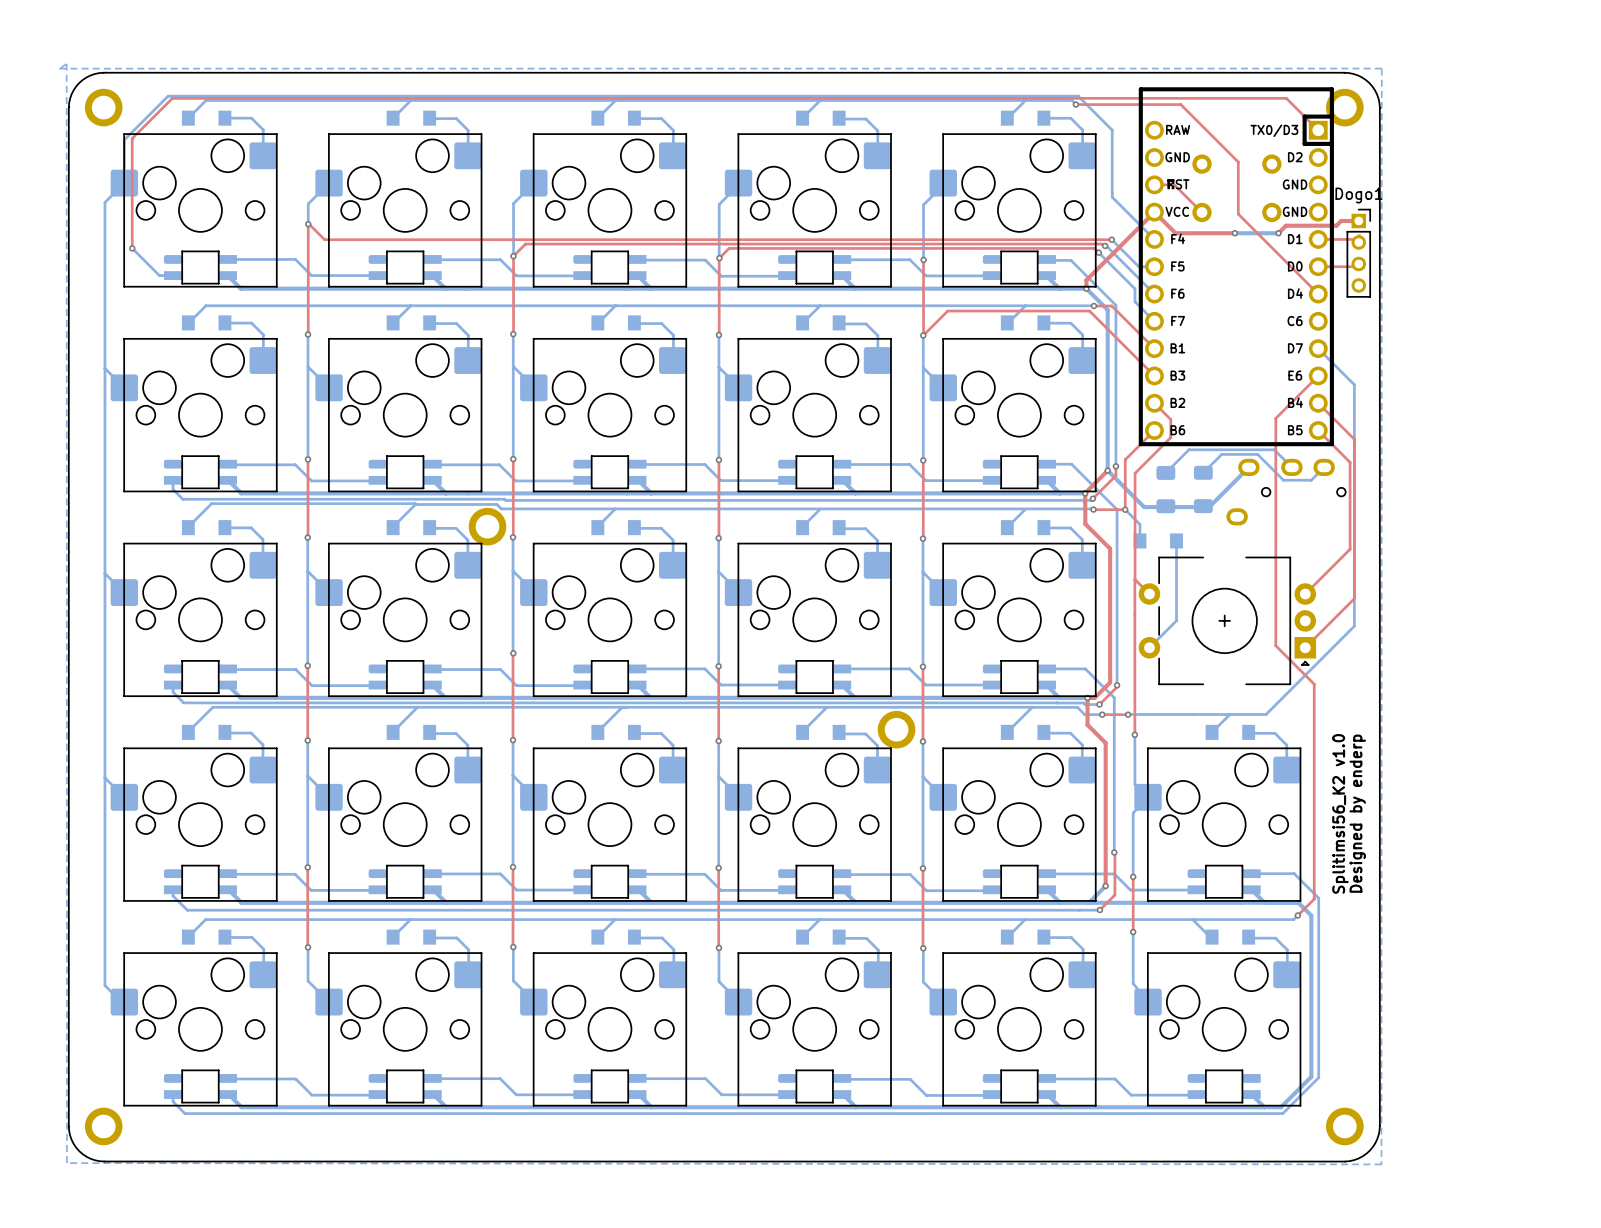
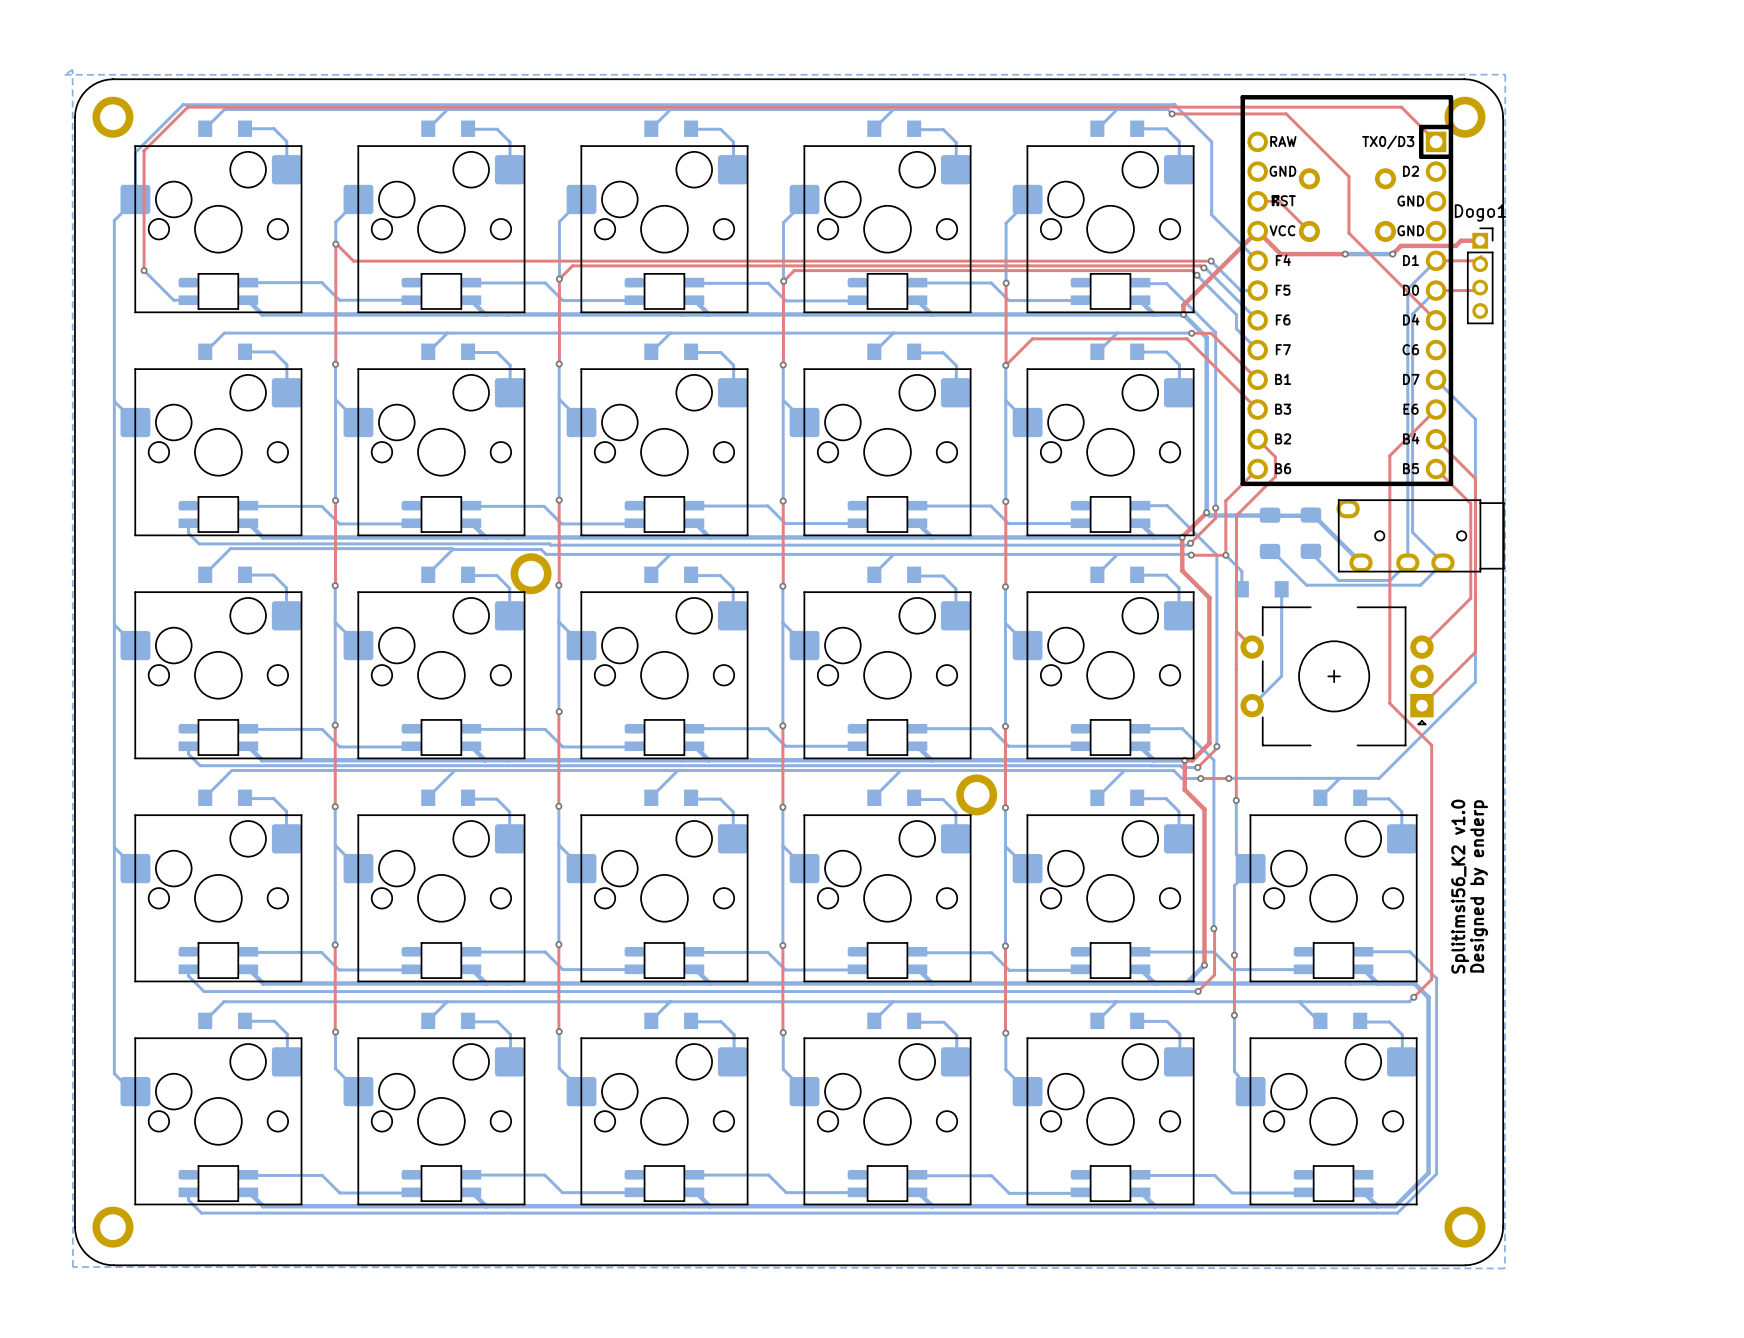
bottom track: none -> (1436, 290) (1412, 314) (1412, 532) (1442, 562) (1420, 585) (1306, 585) (1273, 552)
bottom track: (1248, 467) (1209, 507) (1203, 507) -> (1436, 260) (1407, 289) (1407, 562) (1390, 580) (1338, 580) (1310, 552)
bottom track: (1291, 467) (1274, 449) (1188, 449) (1165, 472) -> none
bottom track: (1324, 467) (1311, 480) (1283, 480) (1257, 454) (1221, 454) (1203, 472) -> none
bottom track: (1110, 473) (1144, 507) (1203, 507) -> (1209, 515) (1272, 515)
bottom track: none -> (1273, 515) (1310, 515)
bottom track: none -> (1314, 515) (1360, 562)
part side: bottom (1286, 492) -> top (1420, 535)

